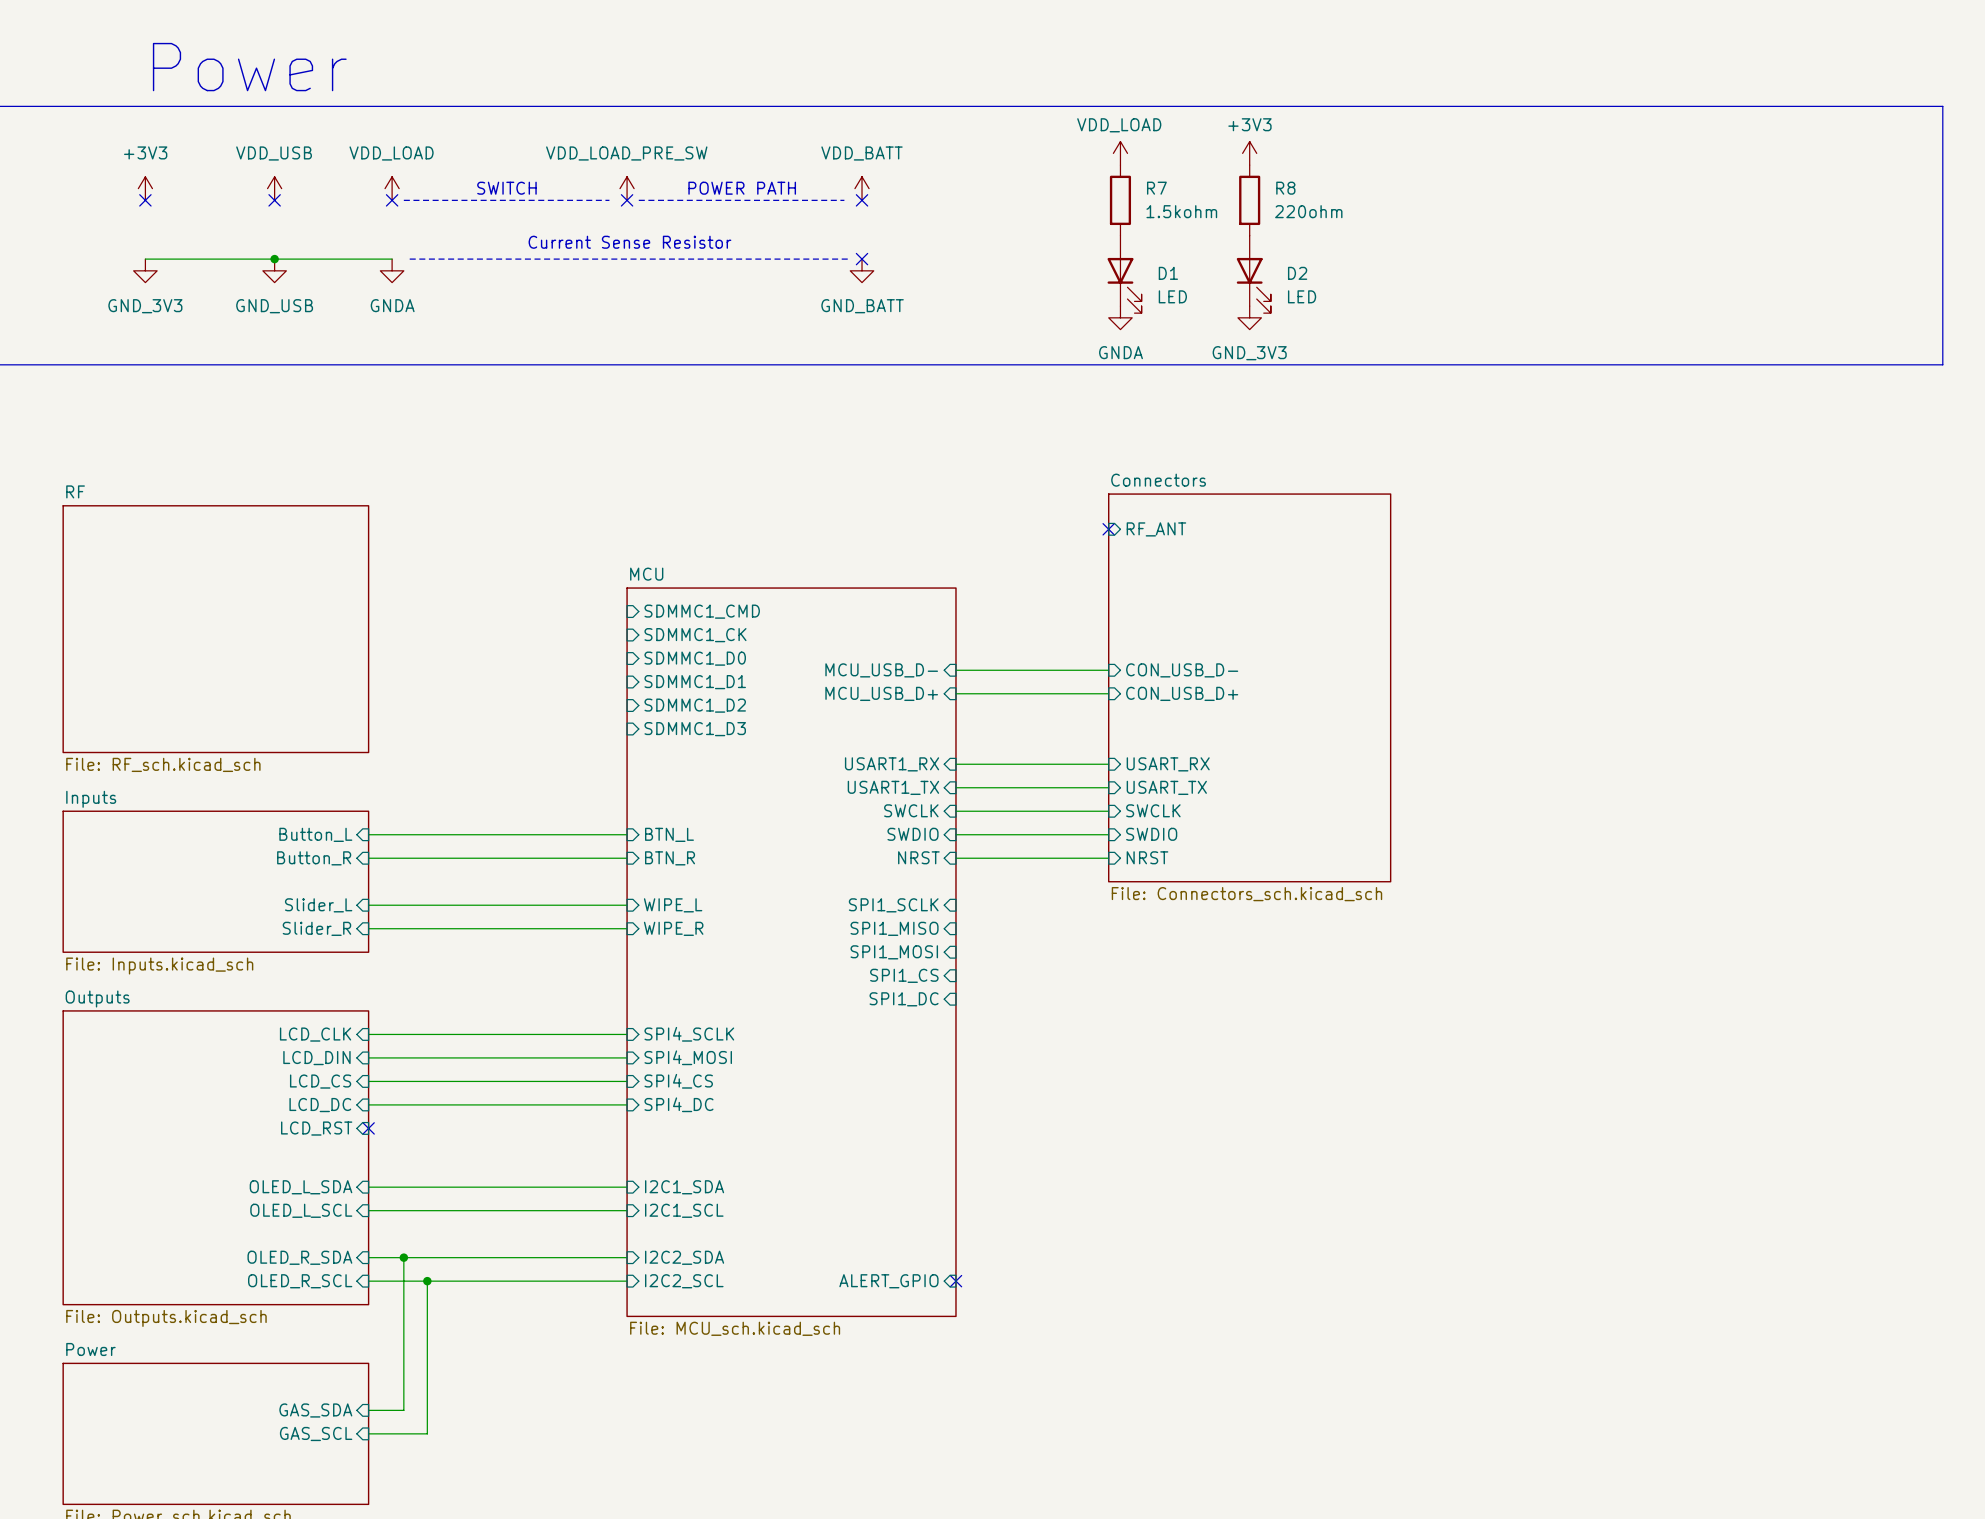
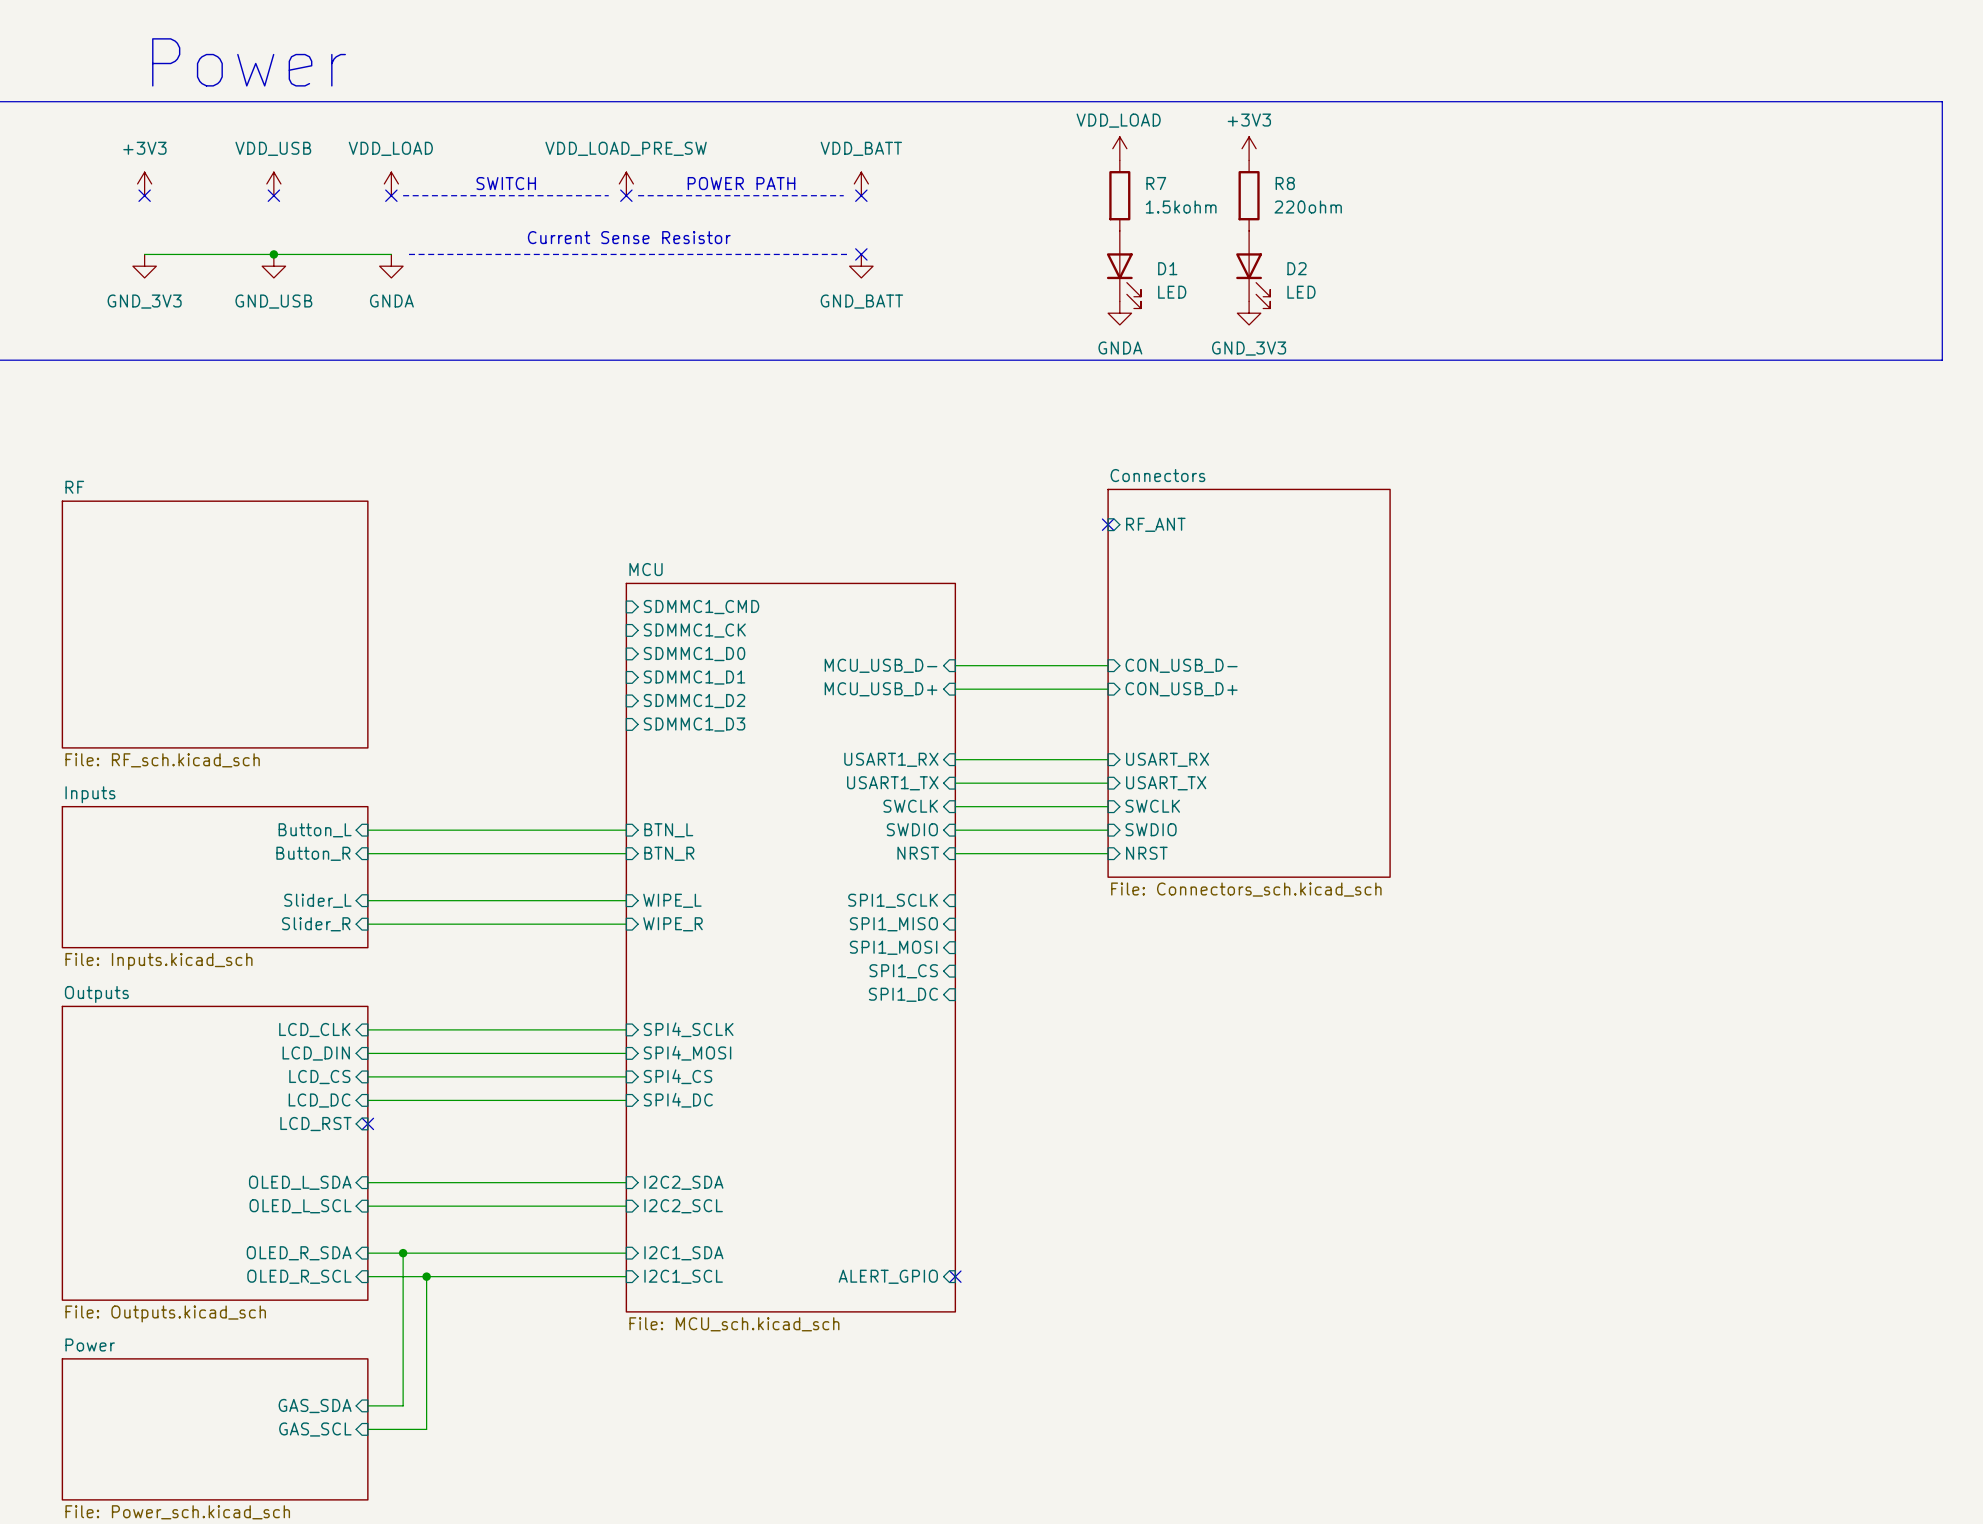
sheet pin: I2C1_SDA (684, 1187) -> I2C2_SDA (683, 1182)
sheet pin: I2C1_SCL (684, 1210) -> I2C2_SCL (683, 1206)
sheet pin: I2C2_SDA (684, 1257) -> I2C1_SDA (683, 1253)
sheet pin: I2C2_SCL (684, 1281) -> I2C1_SCL (683, 1276)

